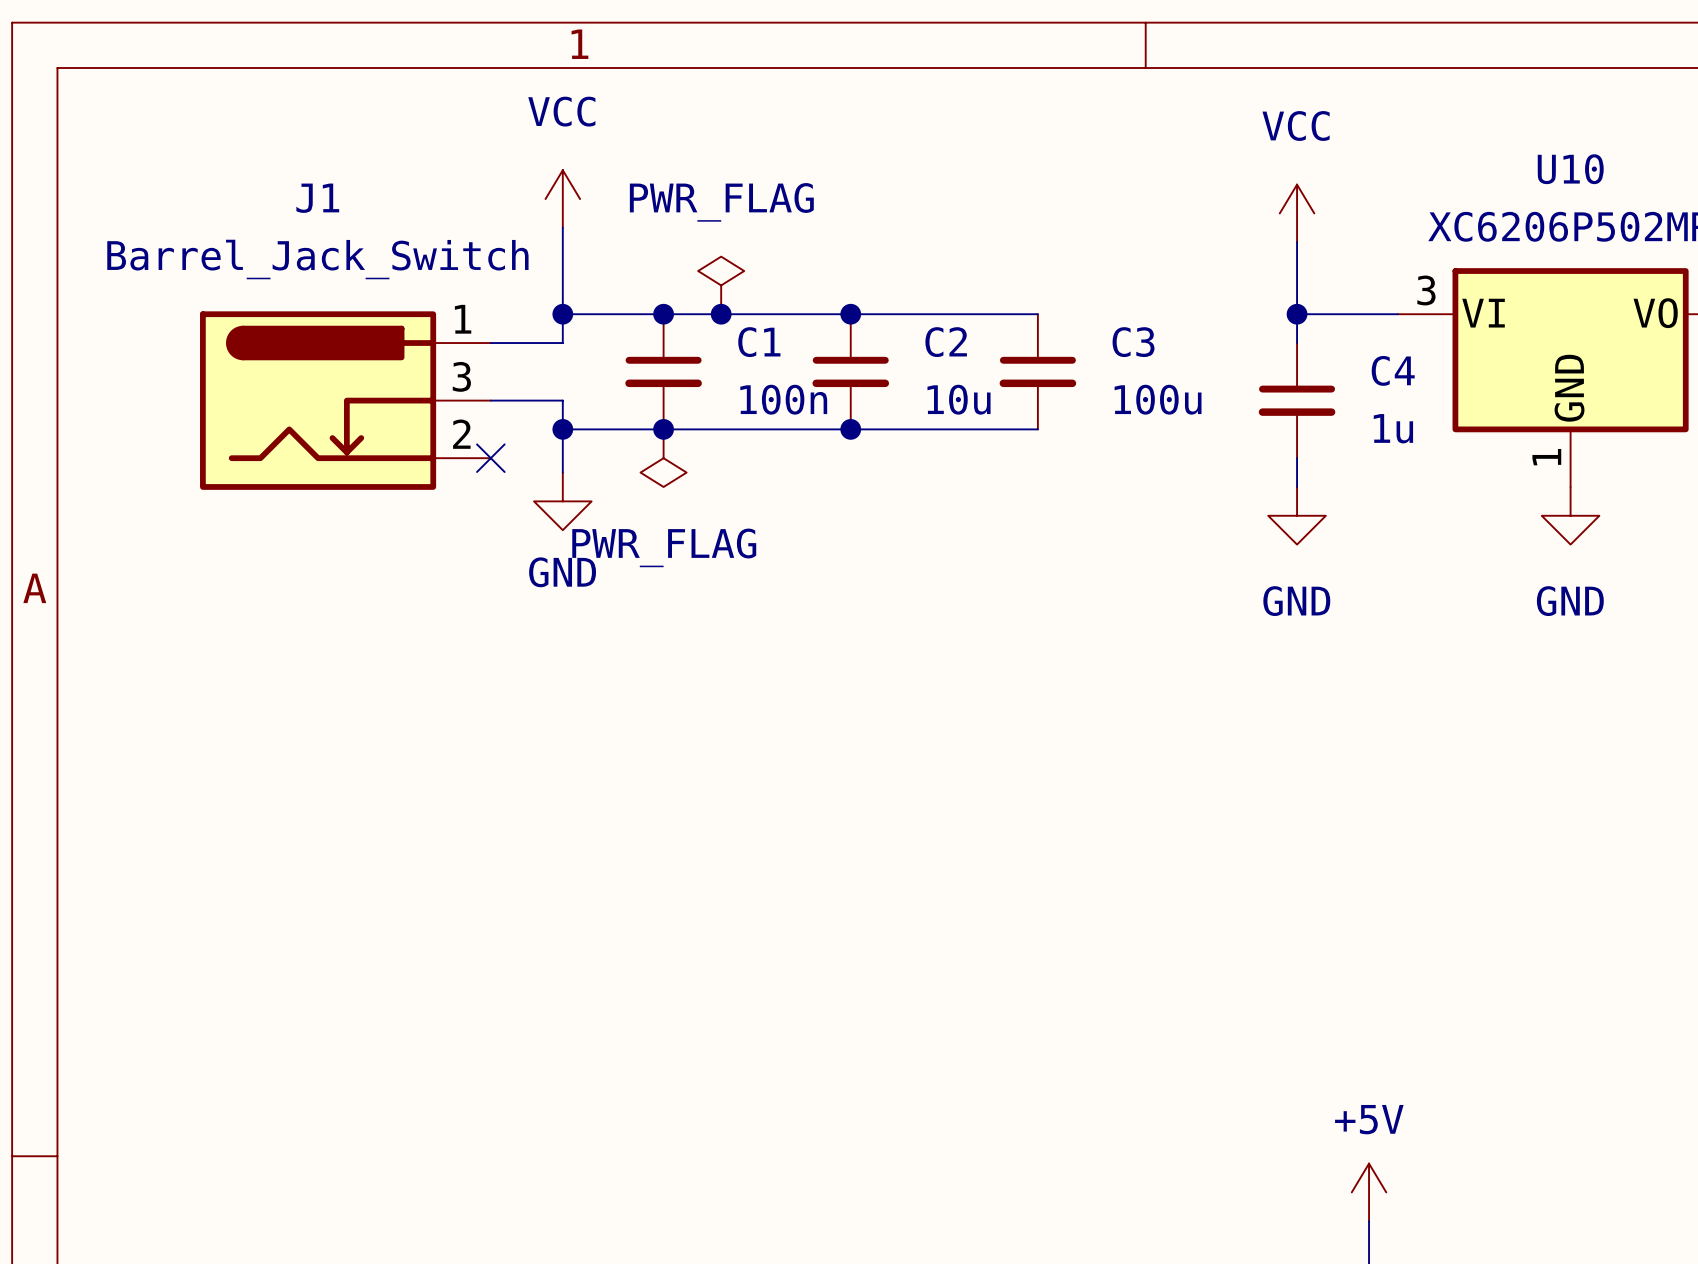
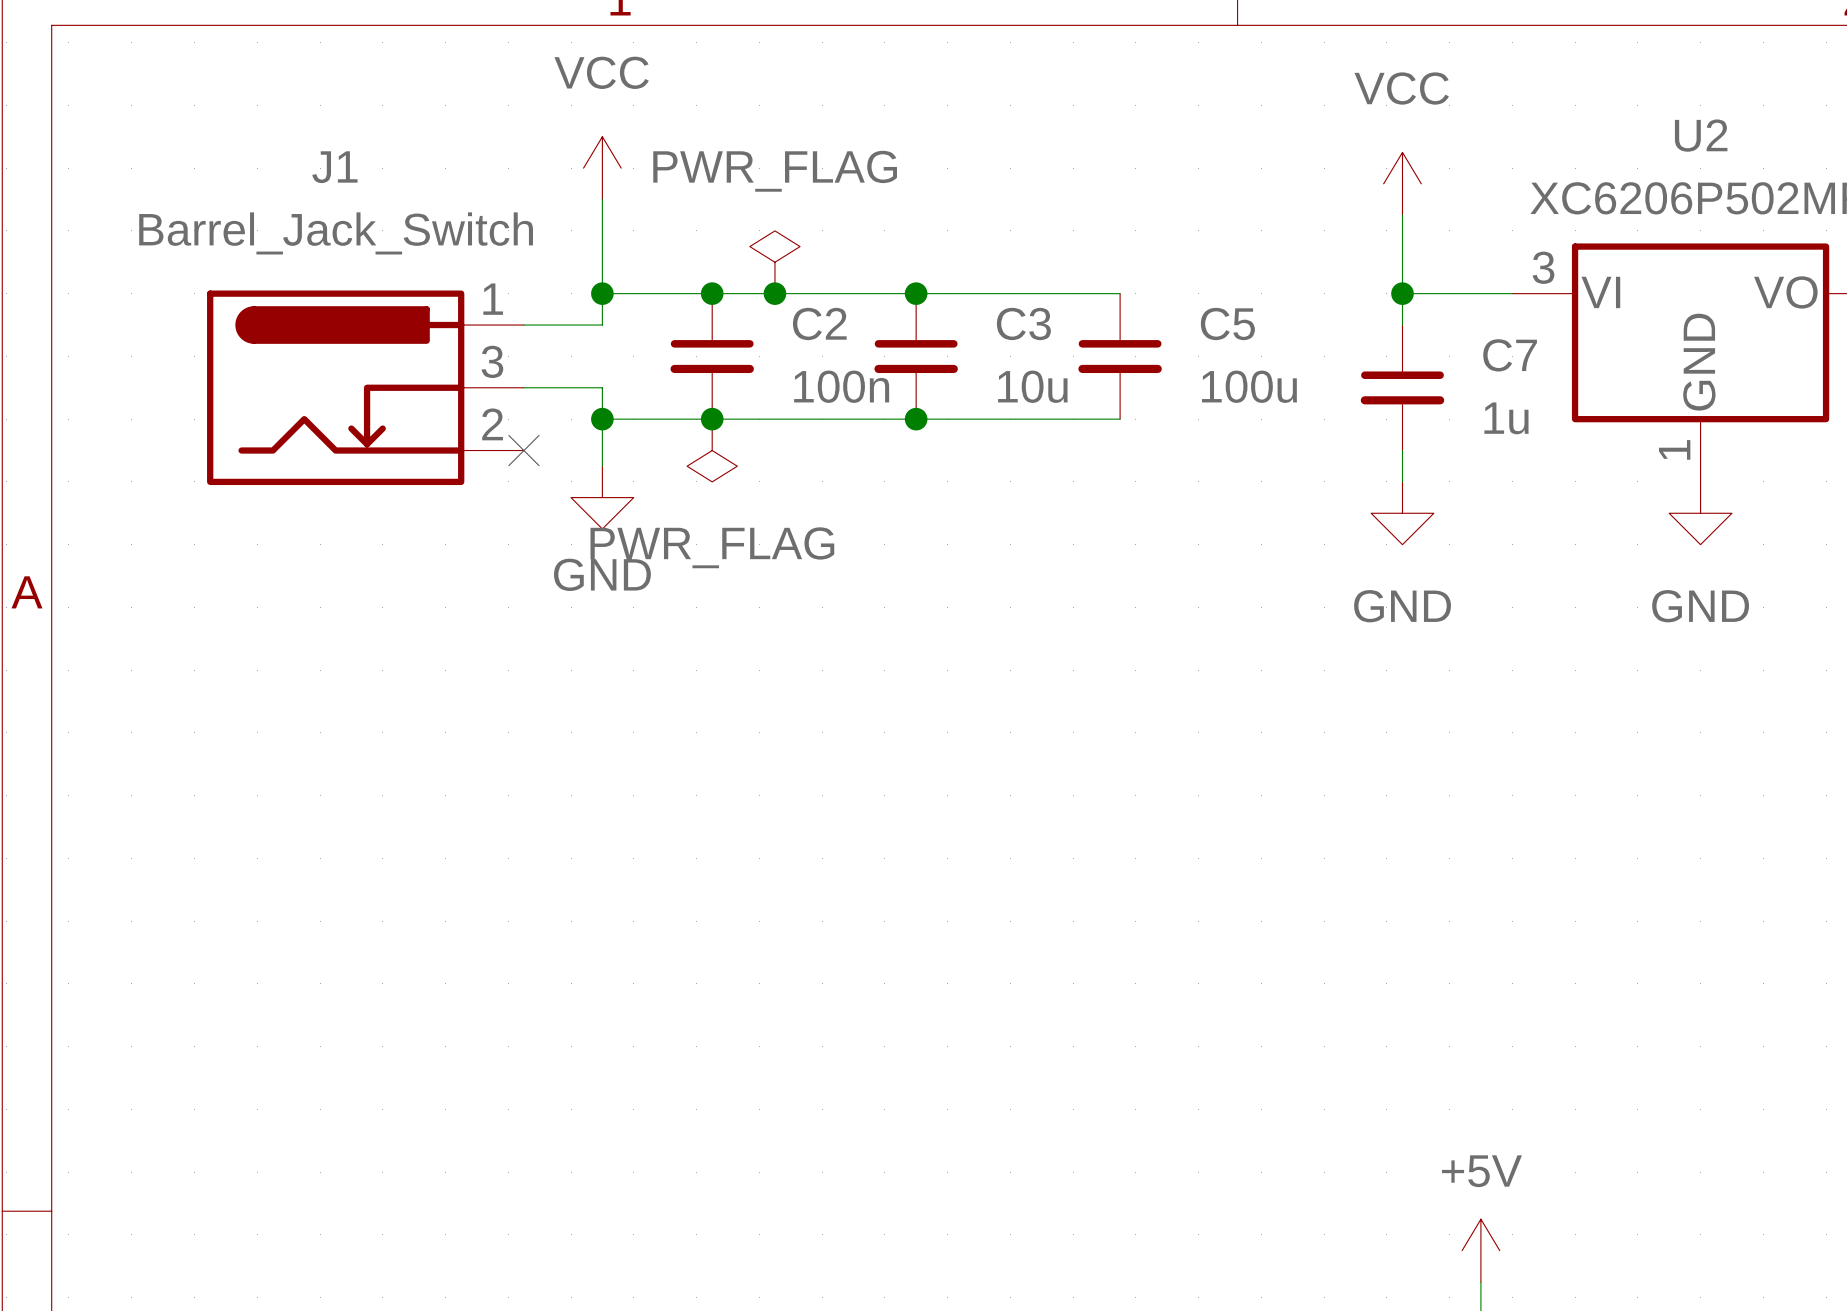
U10 name: U10 (1570, 169) -> U2 (1701, 135)
C1 name: C1 (759, 342) -> C2 (819, 323)
C2 name: C2 (946, 342) -> C3 (1023, 323)
C3 name: C3 (1133, 342) -> C5 (1227, 323)
C4 name: C4 (1393, 370) -> C7 (1510, 355)

